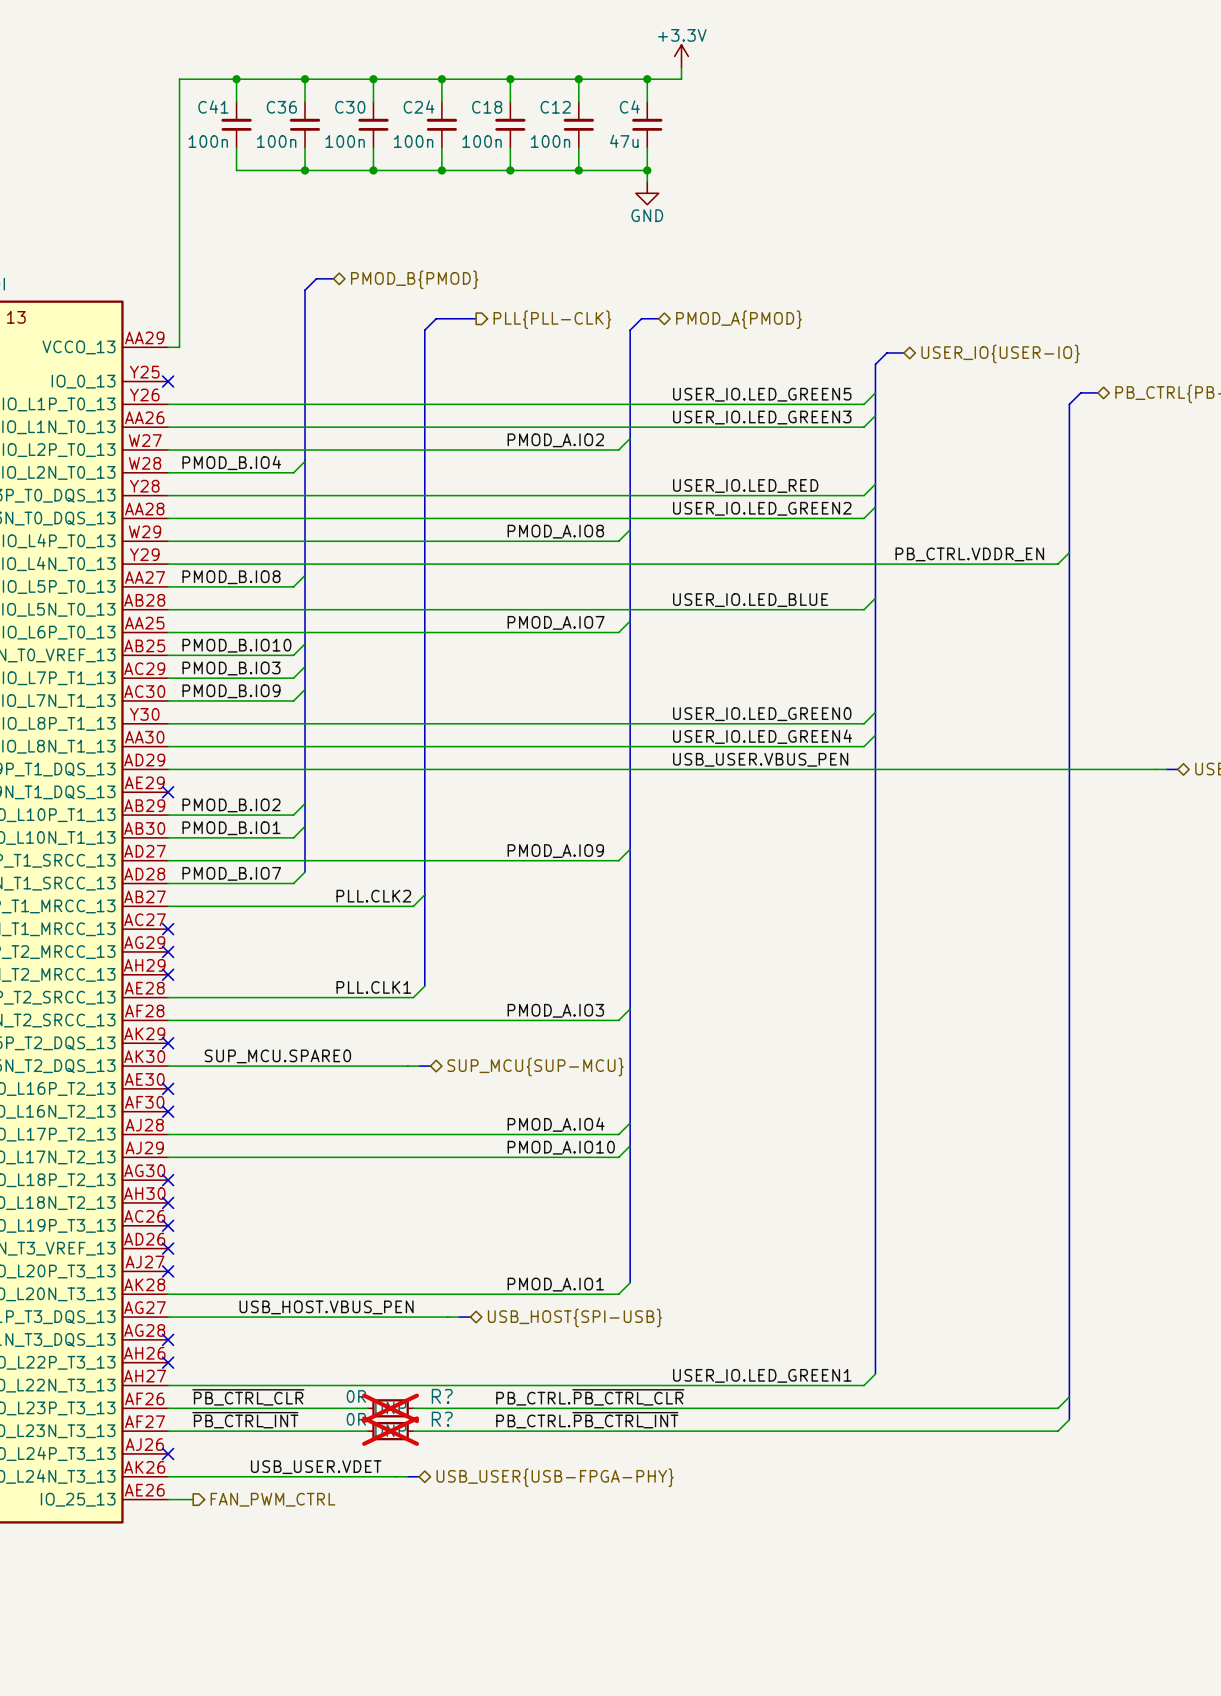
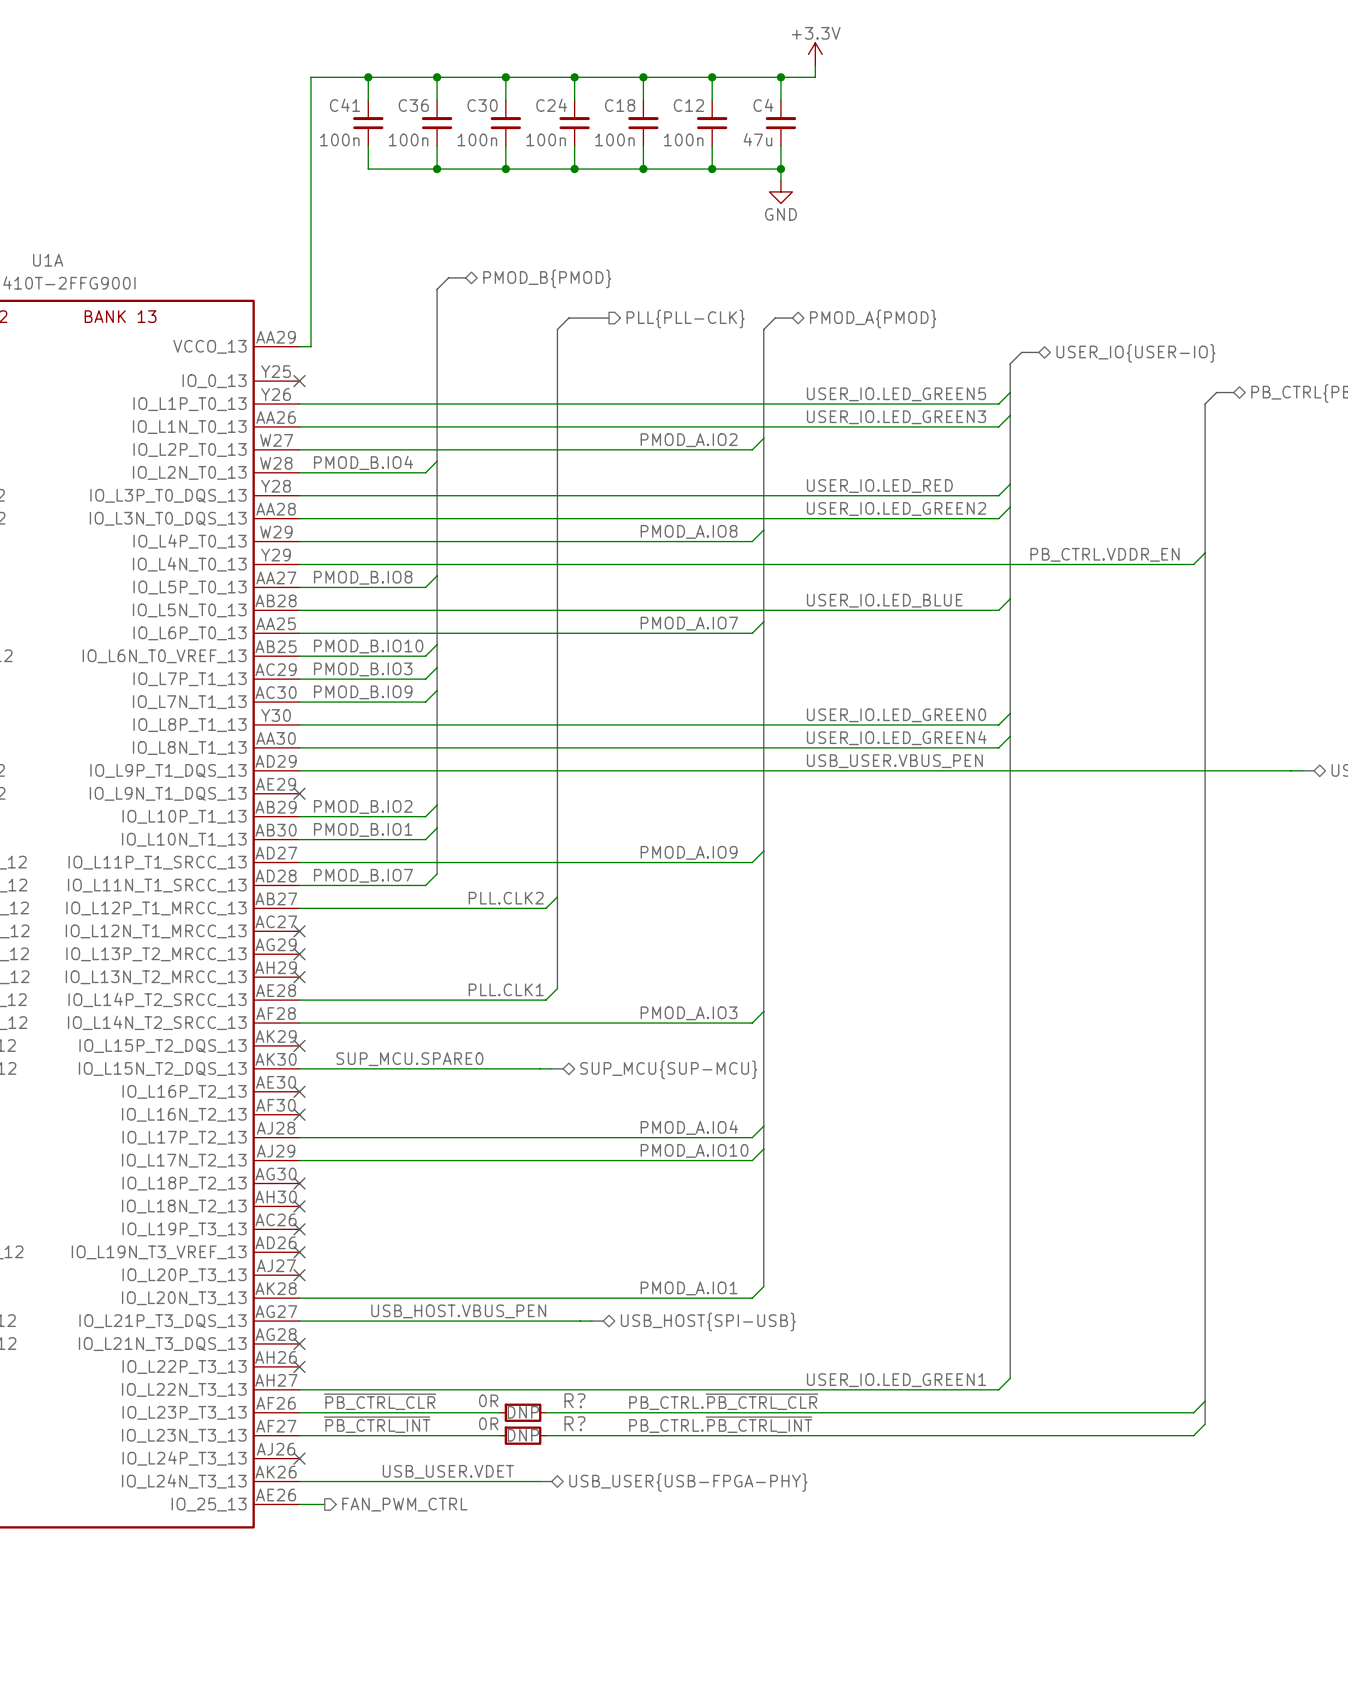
R? do-not-place cross: (390, 1408) -> none
R? do-not-place cross: (390, 1431) -> none

